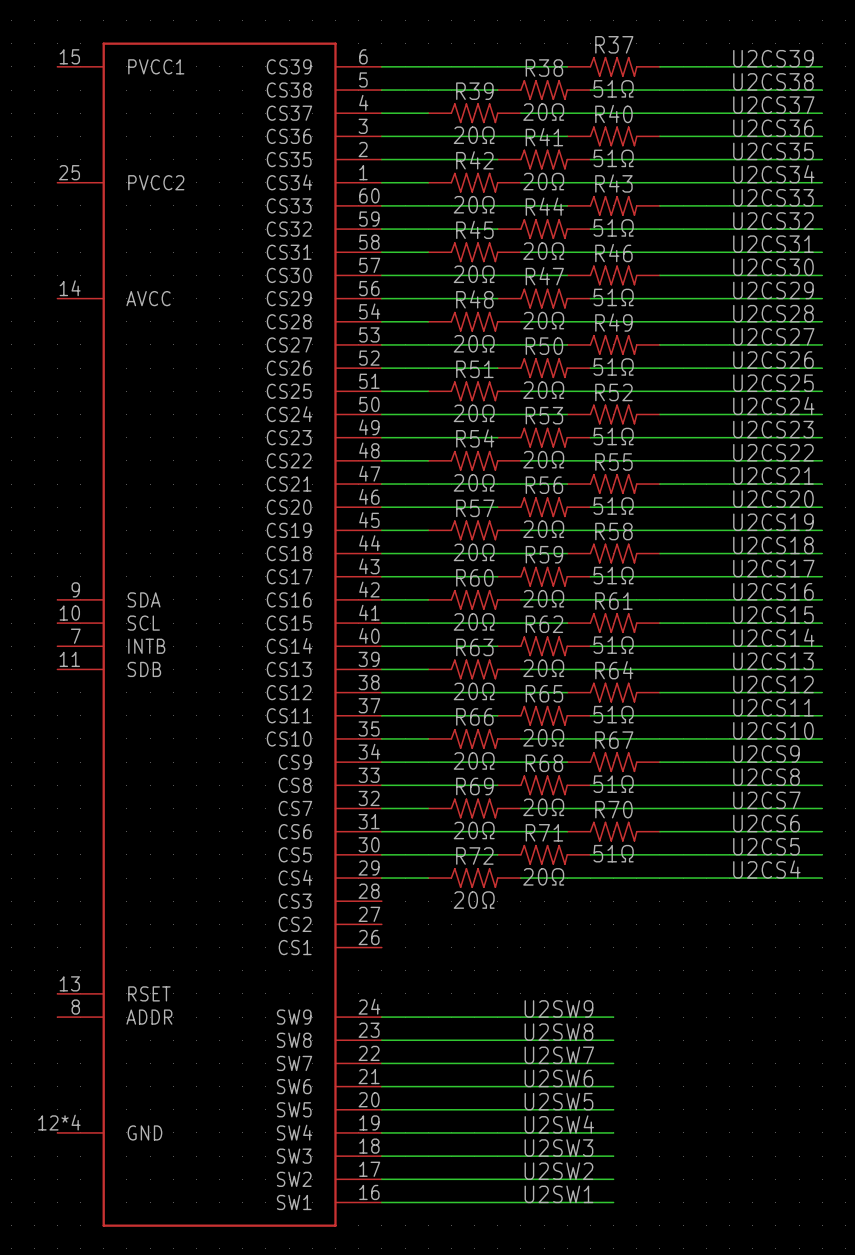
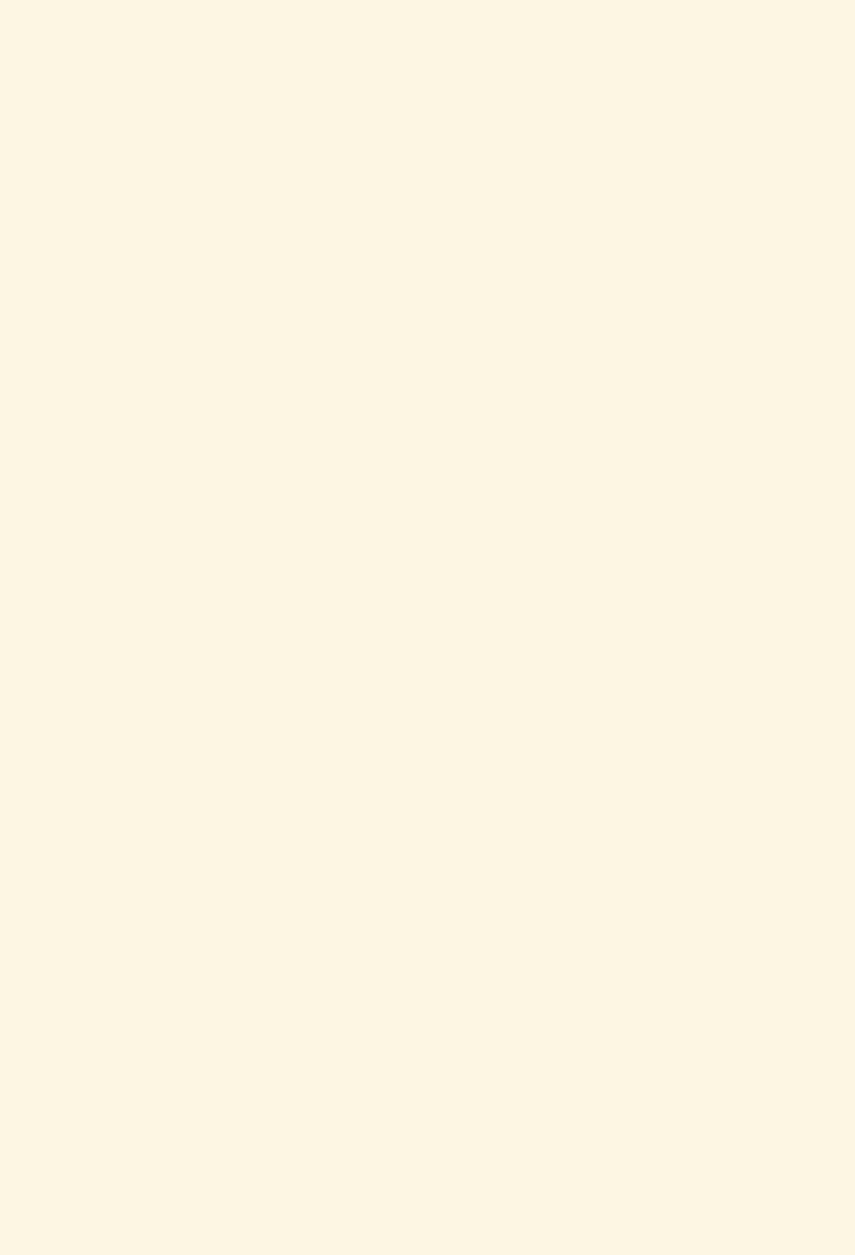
label: U2CS39 (773, 58) -> none
wire: (381, 66) (567, 66) -> none
R37: 51Ω (613, 66) -> none
wire: (659, 66) (822, 66) -> none
label: U2CS38 (773, 81) -> none
wire: (381, 90) (497, 90) -> none
R38: 20Ω (544, 90) -> none
wire: (590, 90) (822, 90) -> none
label: U2CS37 (773, 105) -> none
wire: (381, 113) (428, 113) -> none
R39: 20Ω (474, 113) -> none
wire: (520, 113) (822, 113) -> none
label: U2CS36 (773, 128) -> none
wire: (381, 136) (567, 136) -> none
R40: 51Ω (613, 136) -> none
wire: (659, 136) (822, 136) -> none
label: U2CS35 (773, 151) -> none
wire: (381, 159) (497, 159) -> none
R41: 20Ω (544, 159) -> none
wire: (590, 159) (822, 159) -> none
label: U2CS34 (773, 174) -> none
wire: (381, 182) (428, 182) -> none
R42: 20Ω (474, 182) -> none
wire: (520, 182) (822, 182) -> none
label: U2CS33 (773, 197) -> none
wire: (381, 205) (567, 205) -> none
R43: 51Ω (613, 205) -> none
wire: (659, 205) (822, 205) -> none
label: U2CS32 (773, 220) -> none
wire: (381, 229) (497, 229) -> none
R44: 20Ω (544, 229) -> none
wire: (590, 229) (822, 229) -> none
label: U2CS31 (773, 244) -> none
wire: (381, 252) (428, 252) -> none
R45: 20Ω (474, 252) -> none
wire: (520, 252) (822, 252) -> none
label: U2CS30 (773, 267) -> none
wire: (381, 275) (567, 275) -> none
R46: 51Ω (613, 275) -> none
wire: (659, 275) (822, 275) -> none
label: U2CS29 (773, 290) -> none
wire: (381, 298) (497, 298) -> none
R47: 20Ω (544, 298) -> none
wire: (590, 298) (822, 298) -> none
label: U2CS28 (773, 313) -> none
wire: (381, 321) (428, 321) -> none
R48: 20Ω (474, 321) -> none
wire: (520, 321) (822, 321) -> none
label: U2CS27 (773, 336) -> none
wire: (381, 344) (567, 344) -> none
R49: 51Ω (613, 344) -> none
wire: (659, 344) (822, 344) -> none
label: U2CS26 (773, 360) -> none
wire: (381, 368) (497, 368) -> none
R50: 20Ω (544, 368) -> none
wire: (590, 368) (822, 368) -> none
label: U2CS25 (773, 383) -> none
wire: (381, 391) (428, 391) -> none
R51: 20Ω (474, 391) -> none
wire: (520, 391) (822, 391) -> none
label: U2CS24 (773, 405) -> none
wire: (381, 414) (567, 414) -> none
R52: 51Ω (613, 414) -> none
wire: (659, 414) (822, 414) -> none
label: U2CS23 (773, 429) -> none
wire: (381, 437) (497, 437) -> none
R53: 20Ω (544, 437) -> none
wire: (590, 437) (822, 437) -> none
label: U2CS22 (773, 452) -> none
wire: (381, 460) (428, 460) -> none
R54: 20Ω (474, 460) -> none
wire: (520, 460) (822, 460) -> none
label: U2CS21 (773, 475) -> none
wire: (381, 484) (567, 484) -> none
R55: 51Ω (613, 484) -> none
wire: (659, 484) (822, 484) -> none
label: U2CS20 (773, 499) -> none
wire: (381, 507) (497, 507) -> none
R56: 20Ω (544, 507) -> none
wire: (590, 507) (822, 507) -> none
label: U2CS19 (773, 522) -> none
wire: (381, 530) (428, 530) -> none
R57: 20Ω (474, 530) -> none
wire: (520, 530) (822, 530) -> none
label: U2CS18 (773, 545) -> none
wire: (381, 553) (567, 553) -> none
R58: 51Ω (613, 553) -> none
wire: (659, 553) (822, 553) -> none
label: U2CS17 (773, 568) -> none
wire: (381, 576) (497, 576) -> none
R59: 20Ω (544, 576) -> none
wire: (590, 576) (822, 576) -> none
label: U2CS16 (773, 591) -> none
wire: (381, 599) (428, 599) -> none
R60: 20Ω (474, 599) -> none
wire: (520, 599) (822, 599) -> none
label: U2CS15 (773, 614) -> none
wire: (381, 623) (567, 623) -> none
R61: 51Ω (613, 623) -> none
wire: (659, 623) (822, 623) -> none
part: (219, 634) -> none
label: U2CS14 (773, 637) -> none
wire: (381, 646) (497, 646) -> none
R62: 20Ω (544, 646) -> none
wire: (590, 646) (822, 646) -> none
label: U2CS13 (773, 661) -> none
wire: (381, 669) (428, 669) -> none
R63: 20Ω (474, 669) -> none
wire: (520, 669) (822, 669) -> none
label: U2CS12 (773, 684) -> none
wire: (381, 692) (567, 692) -> none
R64: 51Ω (613, 692) -> none
wire: (659, 692) (822, 692) -> none
label: U2CS11 (773, 707) -> none
wire: (381, 715) (497, 715) -> none
R65: 20Ω (544, 715) -> none
wire: (590, 715) (822, 715) -> none
label: U2CS10 (773, 730) -> none
wire: (381, 738) (428, 738) -> none
R66: 20Ω (474, 738) -> none
wire: (520, 738) (822, 738) -> none
label: U2CS9 (766, 754) -> none
wire: (381, 762) (567, 762) -> none
R67: 51Ω (613, 762) -> none
wire: (659, 762) (822, 762) -> none
label: U2CS8 (766, 777) -> none
wire: (381, 785) (497, 785) -> none
R68: 20Ω (544, 785) -> none
wire: (590, 785) (822, 785) -> none
label: U2CS7 (766, 800) -> none
wire: (381, 808) (428, 808) -> none
R69: 20Ω (474, 808) -> none
wire: (520, 808) (822, 808) -> none
label: U2CS6 (766, 823) -> none
wire: (381, 831) (567, 831) -> none
R70: 51Ω (613, 831) -> none
wire: (659, 831) (822, 831) -> none
label: U2CS5 (766, 846) -> none
wire: (381, 854) (497, 854) -> none
R71: 20Ω (544, 854) -> none
wire: (590, 854) (822, 854) -> none
label: U2CS4 (766, 869) -> none
wire: (381, 878) (428, 878) -> none
R72: 20Ω (474, 878) -> none
wire: (520, 878) (822, 878) -> none
label: U2SW9 (558, 1008) -> none
wire: (381, 1017) (613, 1017) -> none
label: U2SW8 (558, 1032) -> none
wire: (381, 1040) (613, 1040) -> none
label: U2SW7 (559, 1055) -> none
wire: (381, 1063) (613, 1063) -> none
label: U2SW6 (558, 1078) -> none
wire: (381, 1086) (613, 1086) -> none
label: U2SW5 (558, 1101) -> none
wire: (381, 1109) (613, 1109) -> none
label: U2SW4 (559, 1124) -> none
wire: (381, 1132) (613, 1132) -> none
label: U2SW3 (558, 1148) -> none
wire: (381, 1156) (613, 1156) -> none
label: U2SW2 (558, 1171) -> none
wire: (381, 1179) (613, 1179) -> none
label: U2SW1 (558, 1194) -> none
wire: (381, 1202) (613, 1202) -> none

